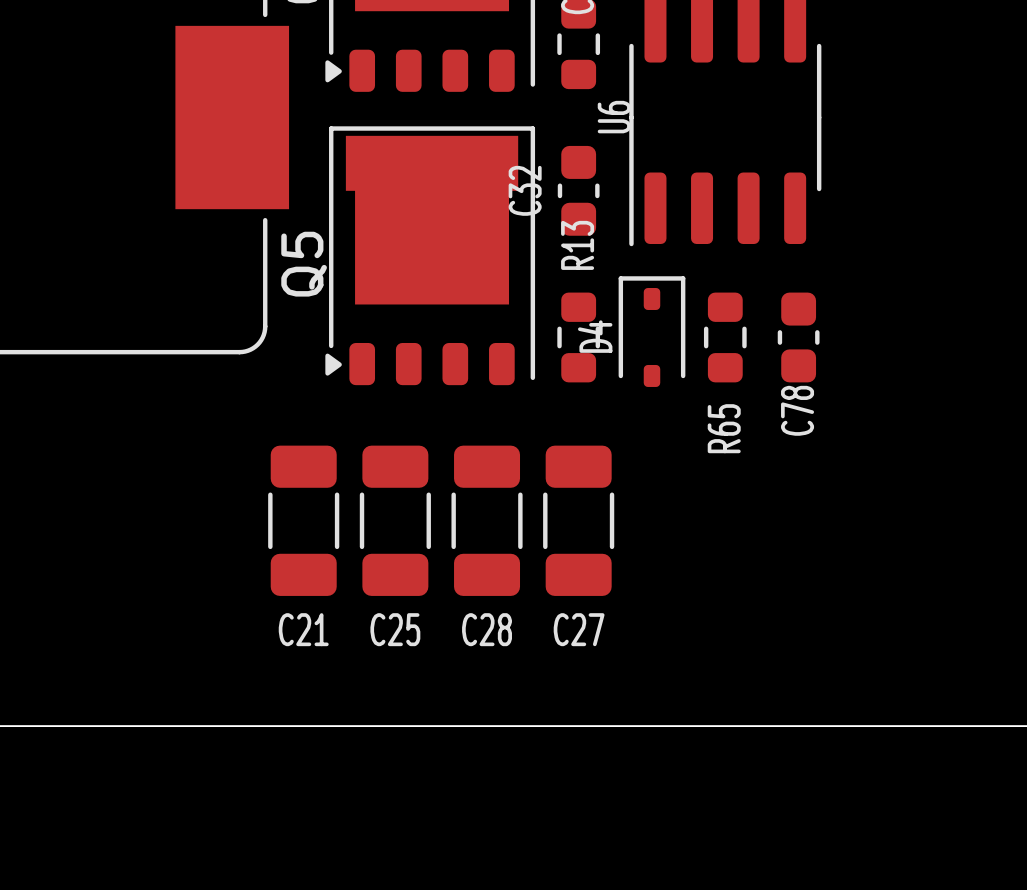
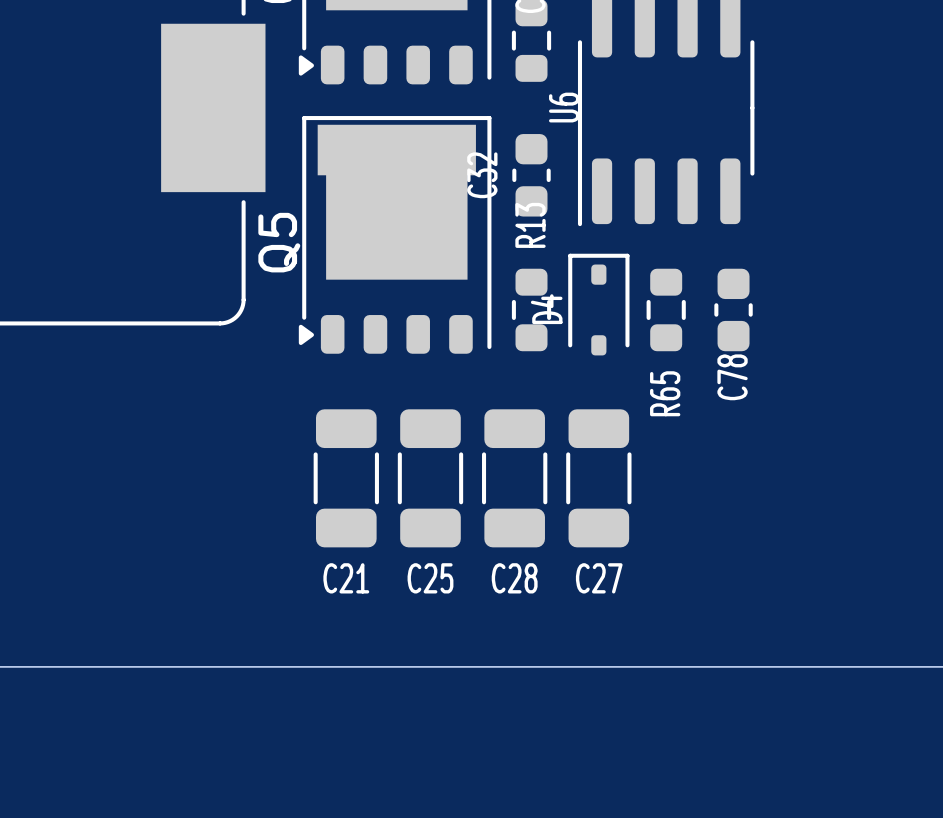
C21 position: (303, 520) -> (346, 478)
C25 position: (395, 520) -> (430, 478)
C28 position: (487, 520) -> (514, 478)
C27 position: (578, 520) -> (598, 478)

